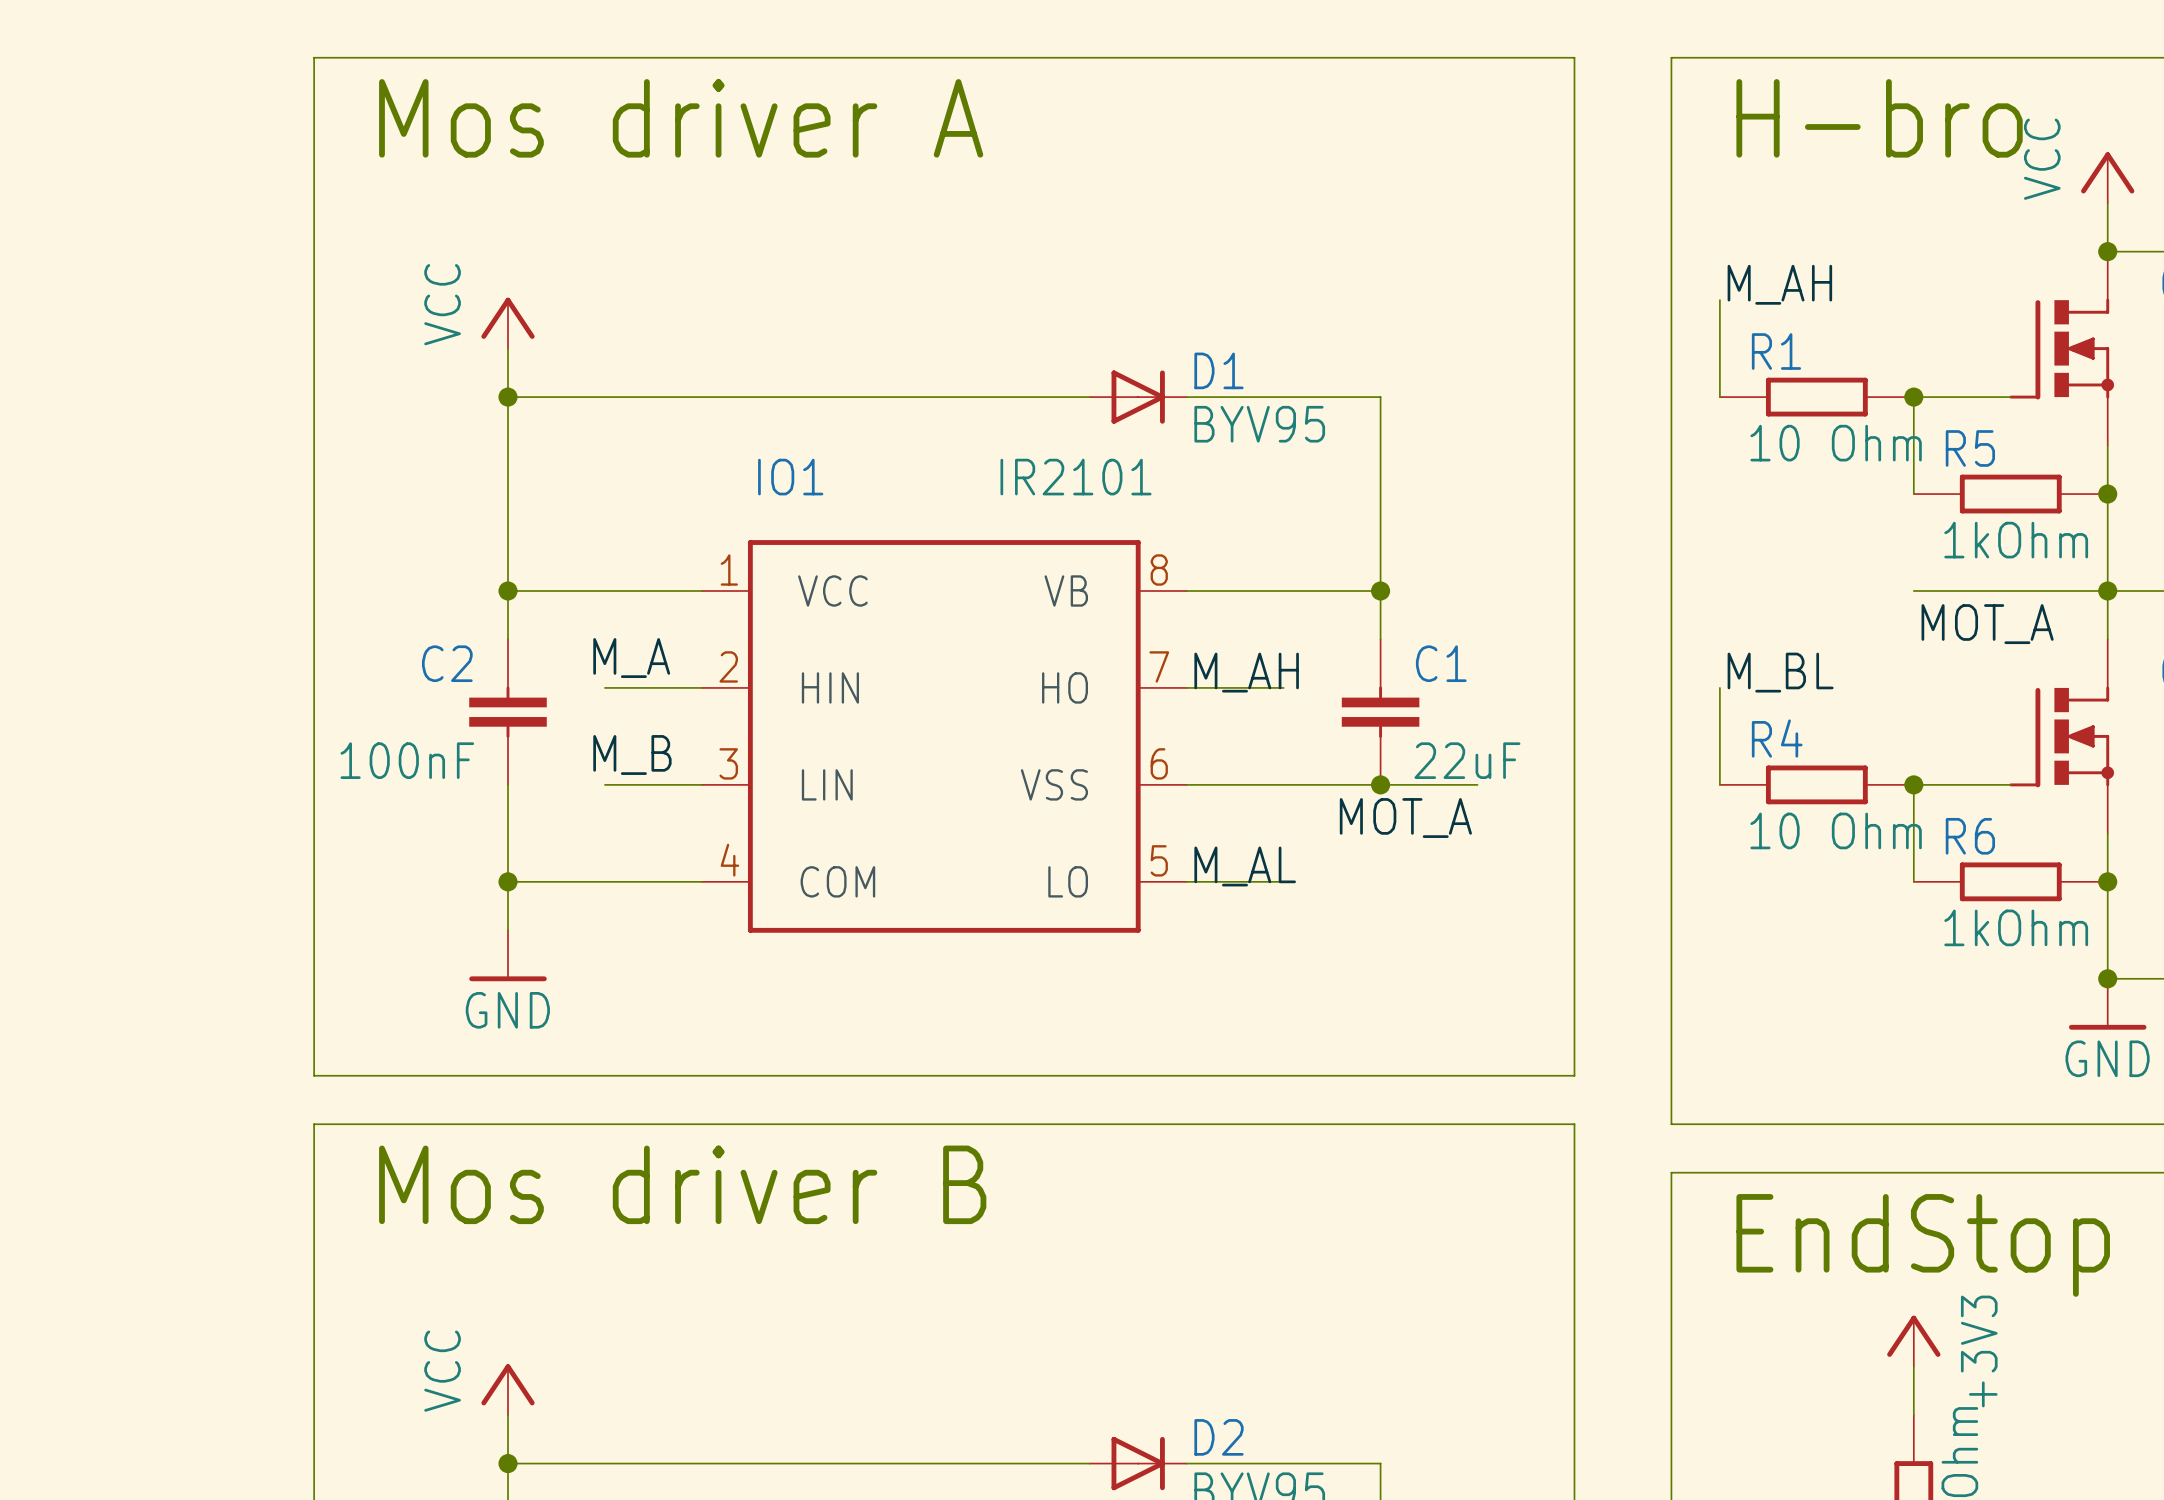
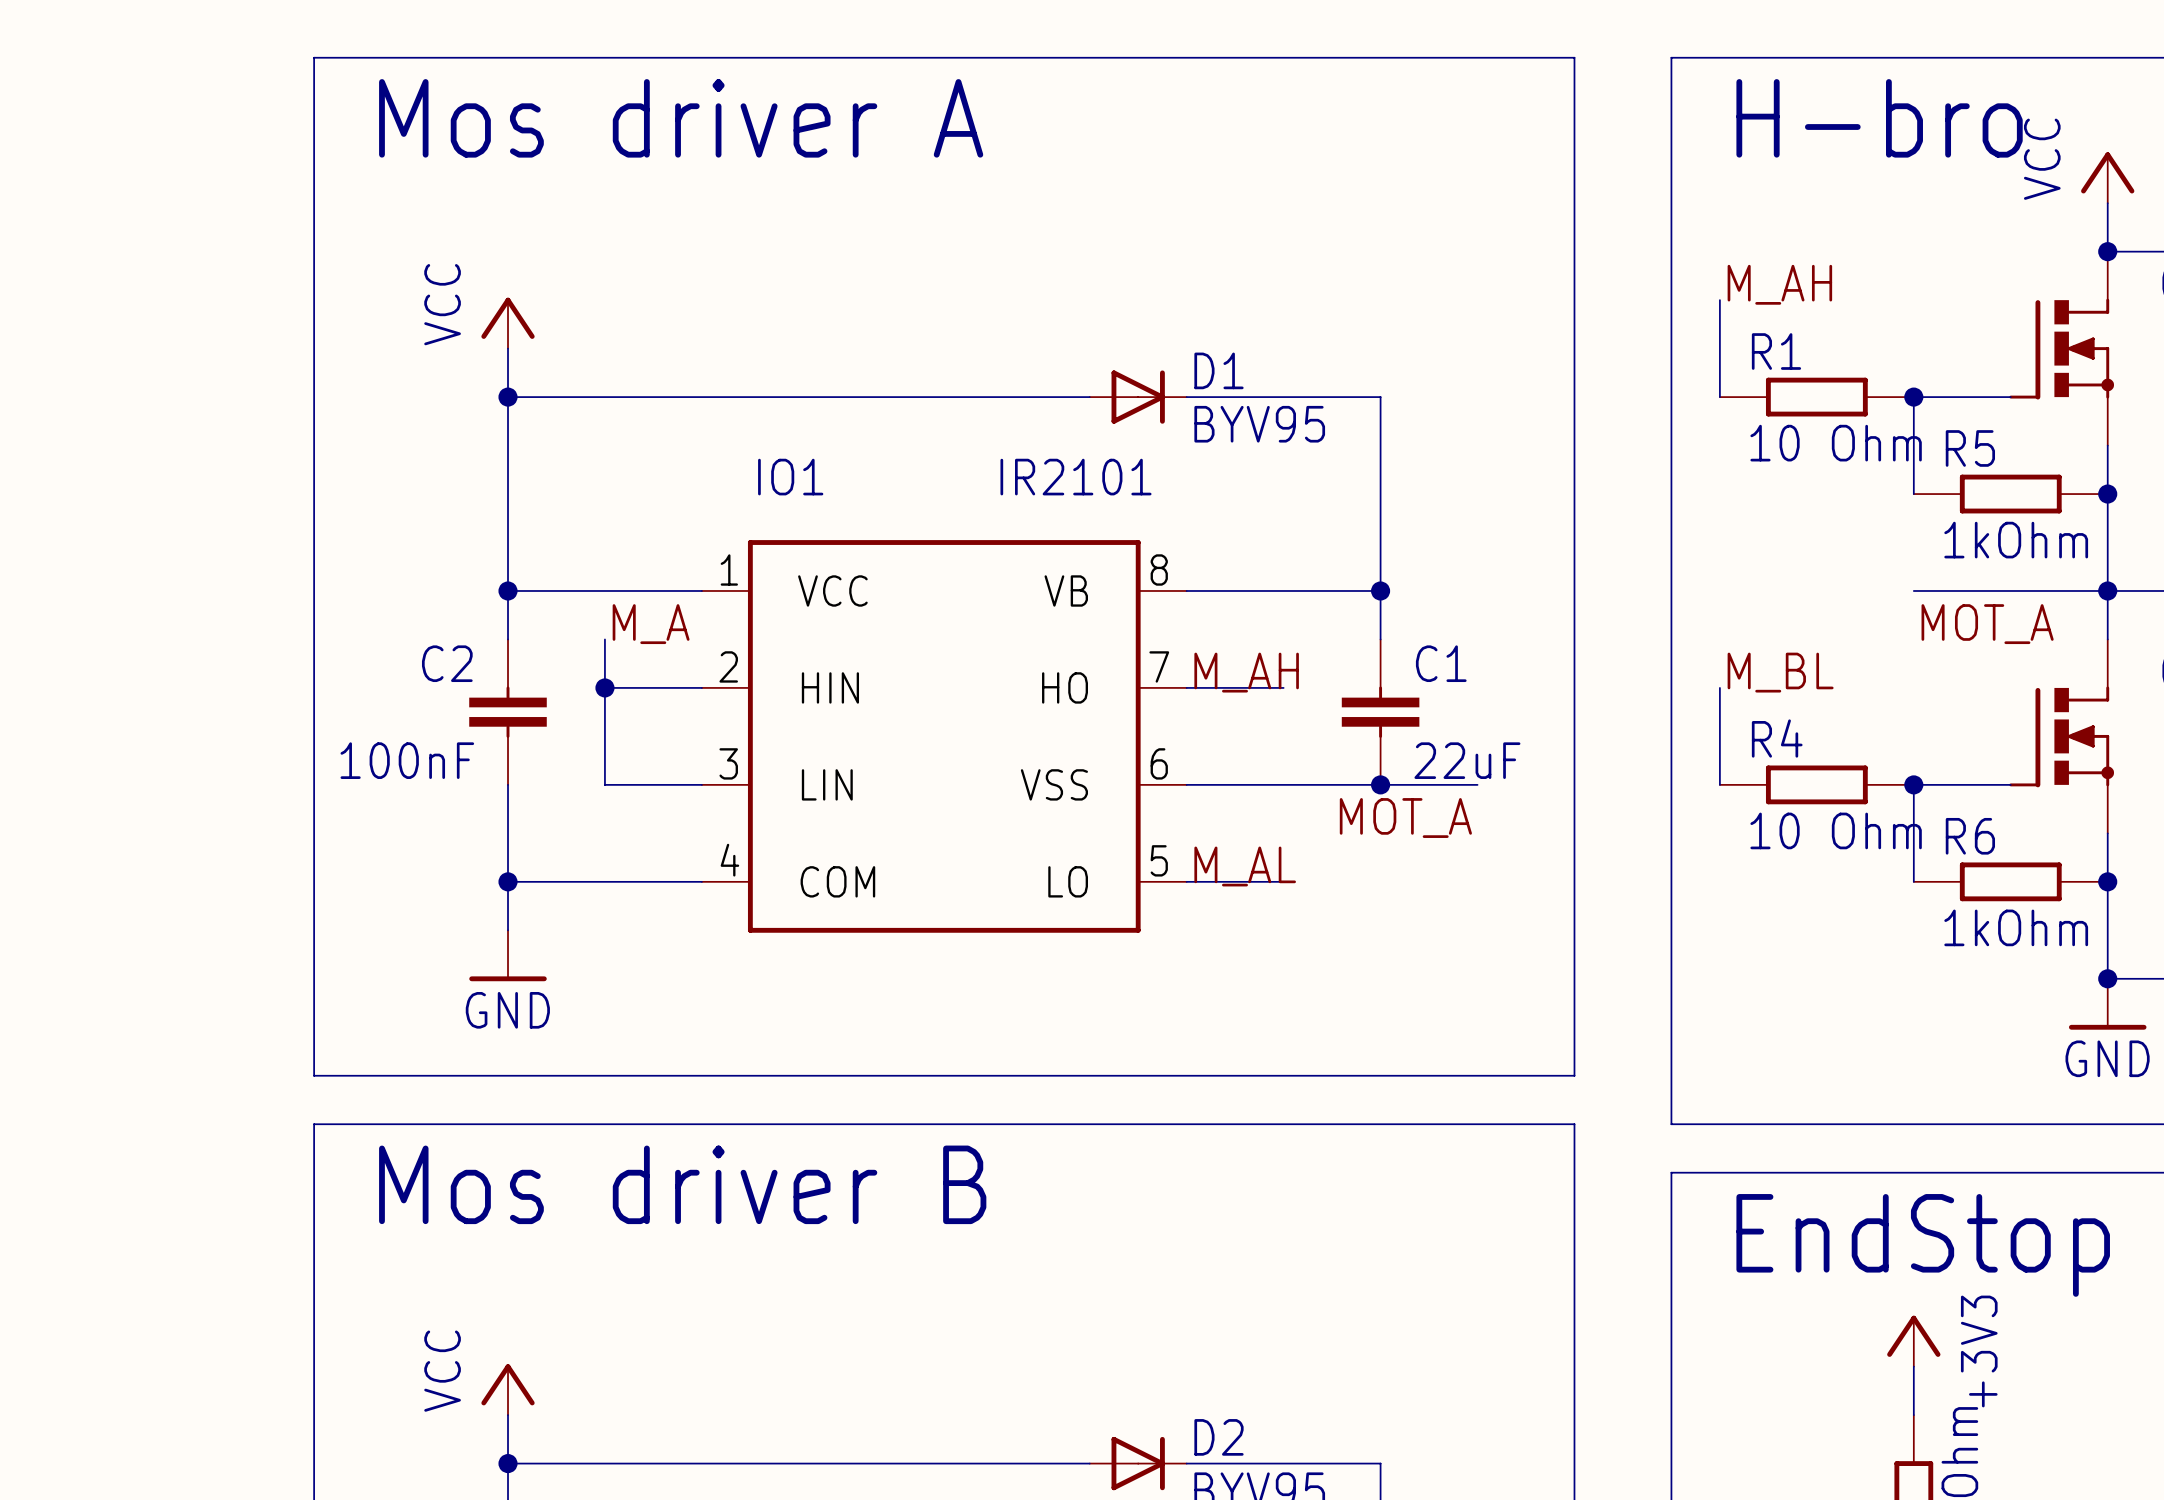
wire: none -> (604, 639) (604, 784)
label position: M_A (631, 658) -> M_A (651, 624)
junction: none -> (604, 687)
label: M_B (632, 755) -> none

